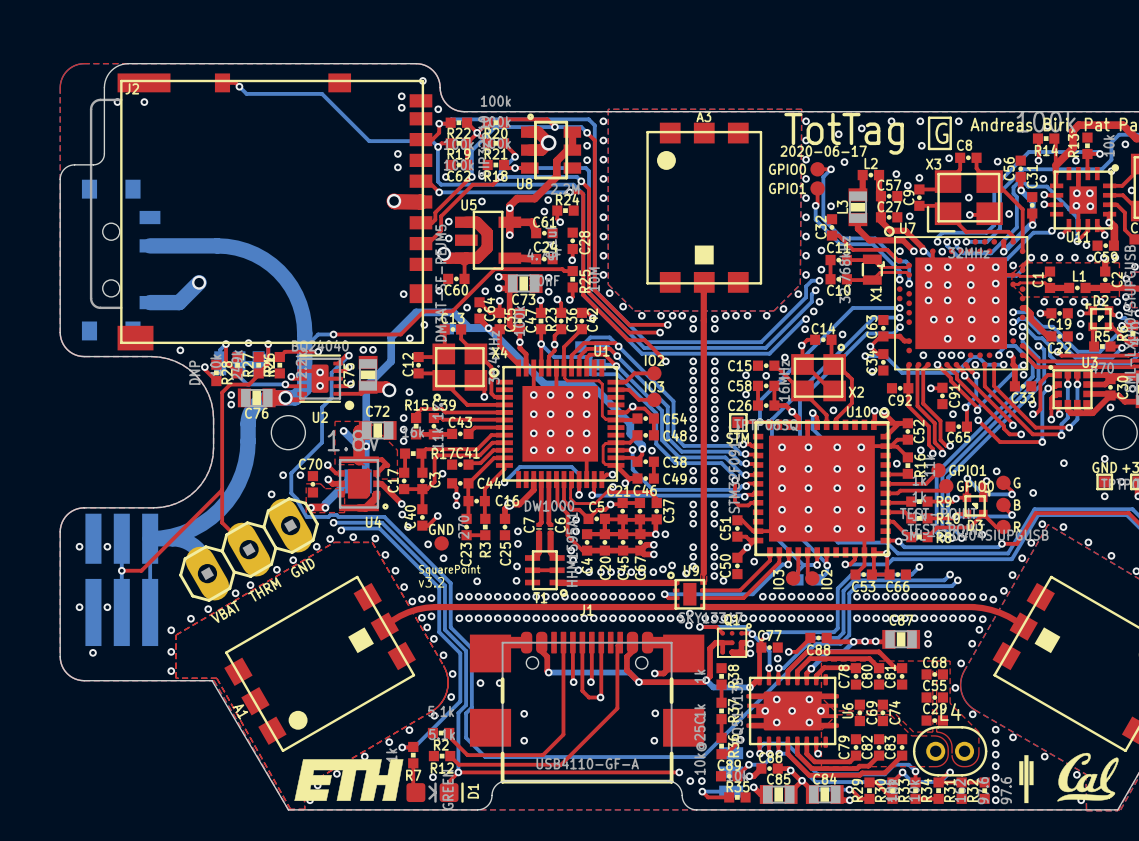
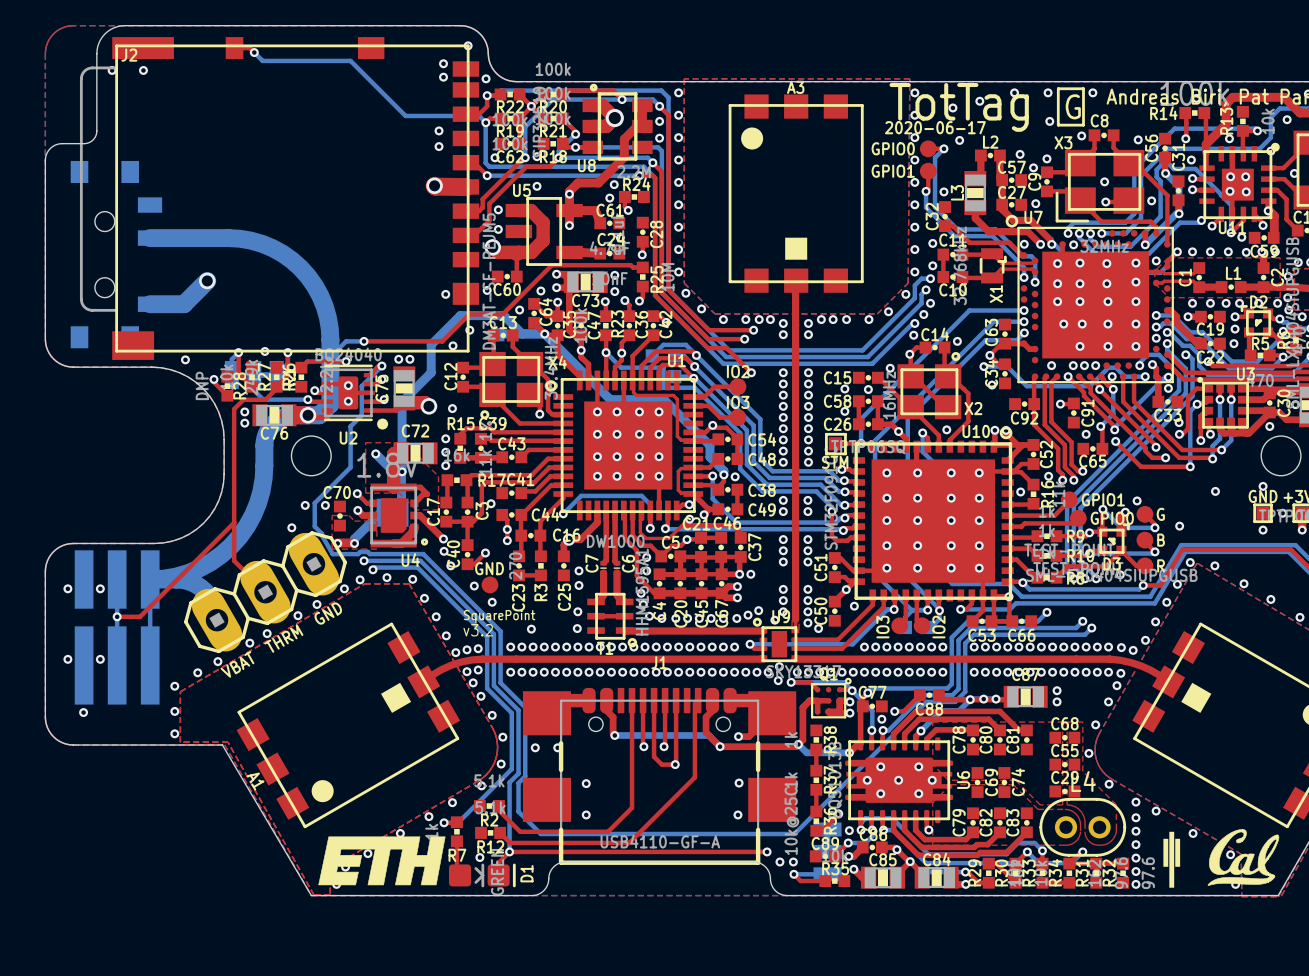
R14 name position: R14 (1046, 150) -> R14 (1163, 113)

